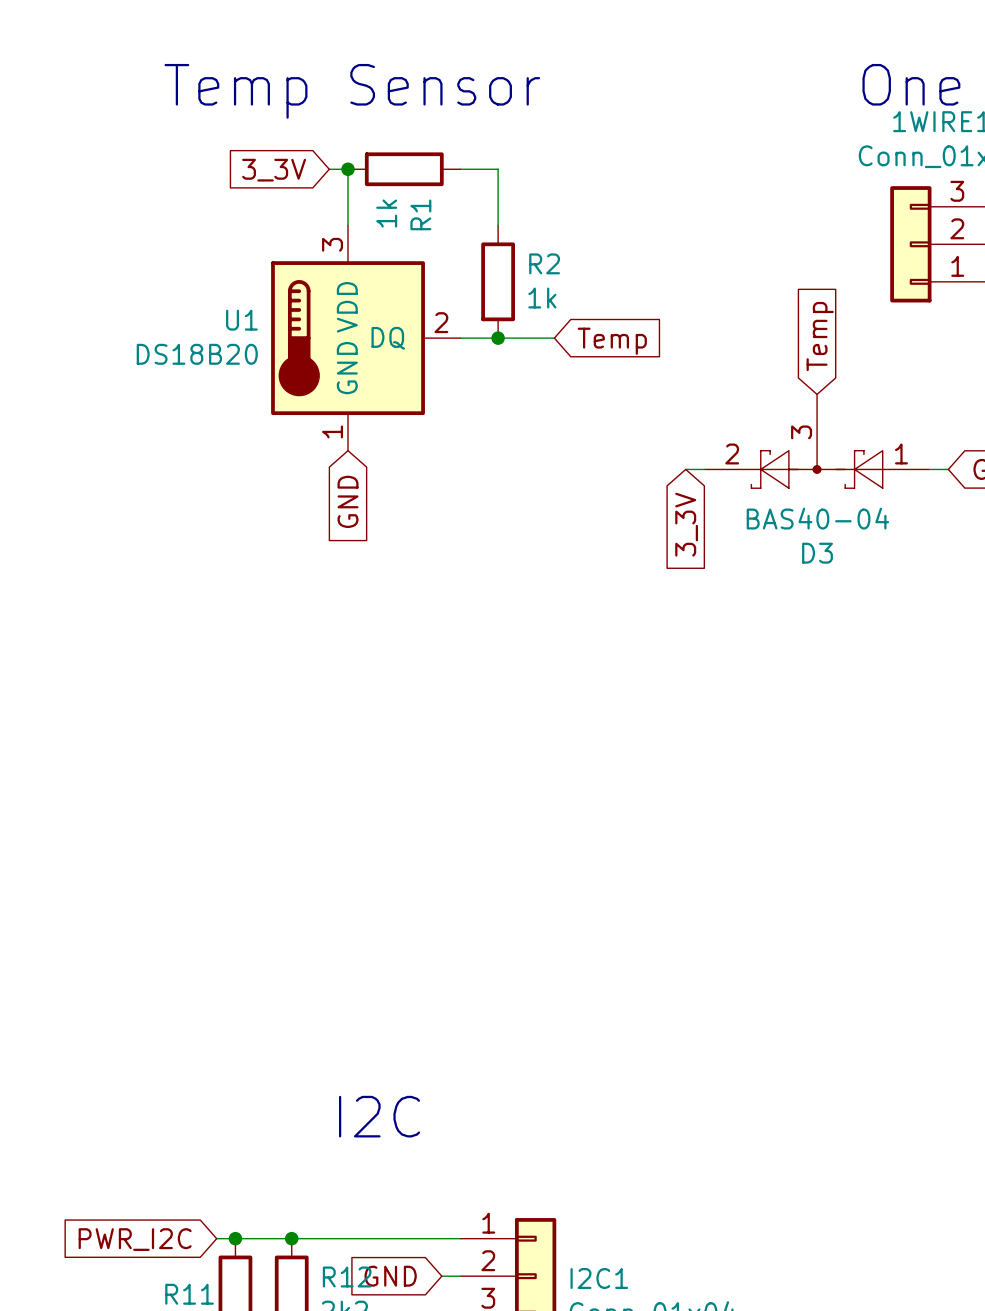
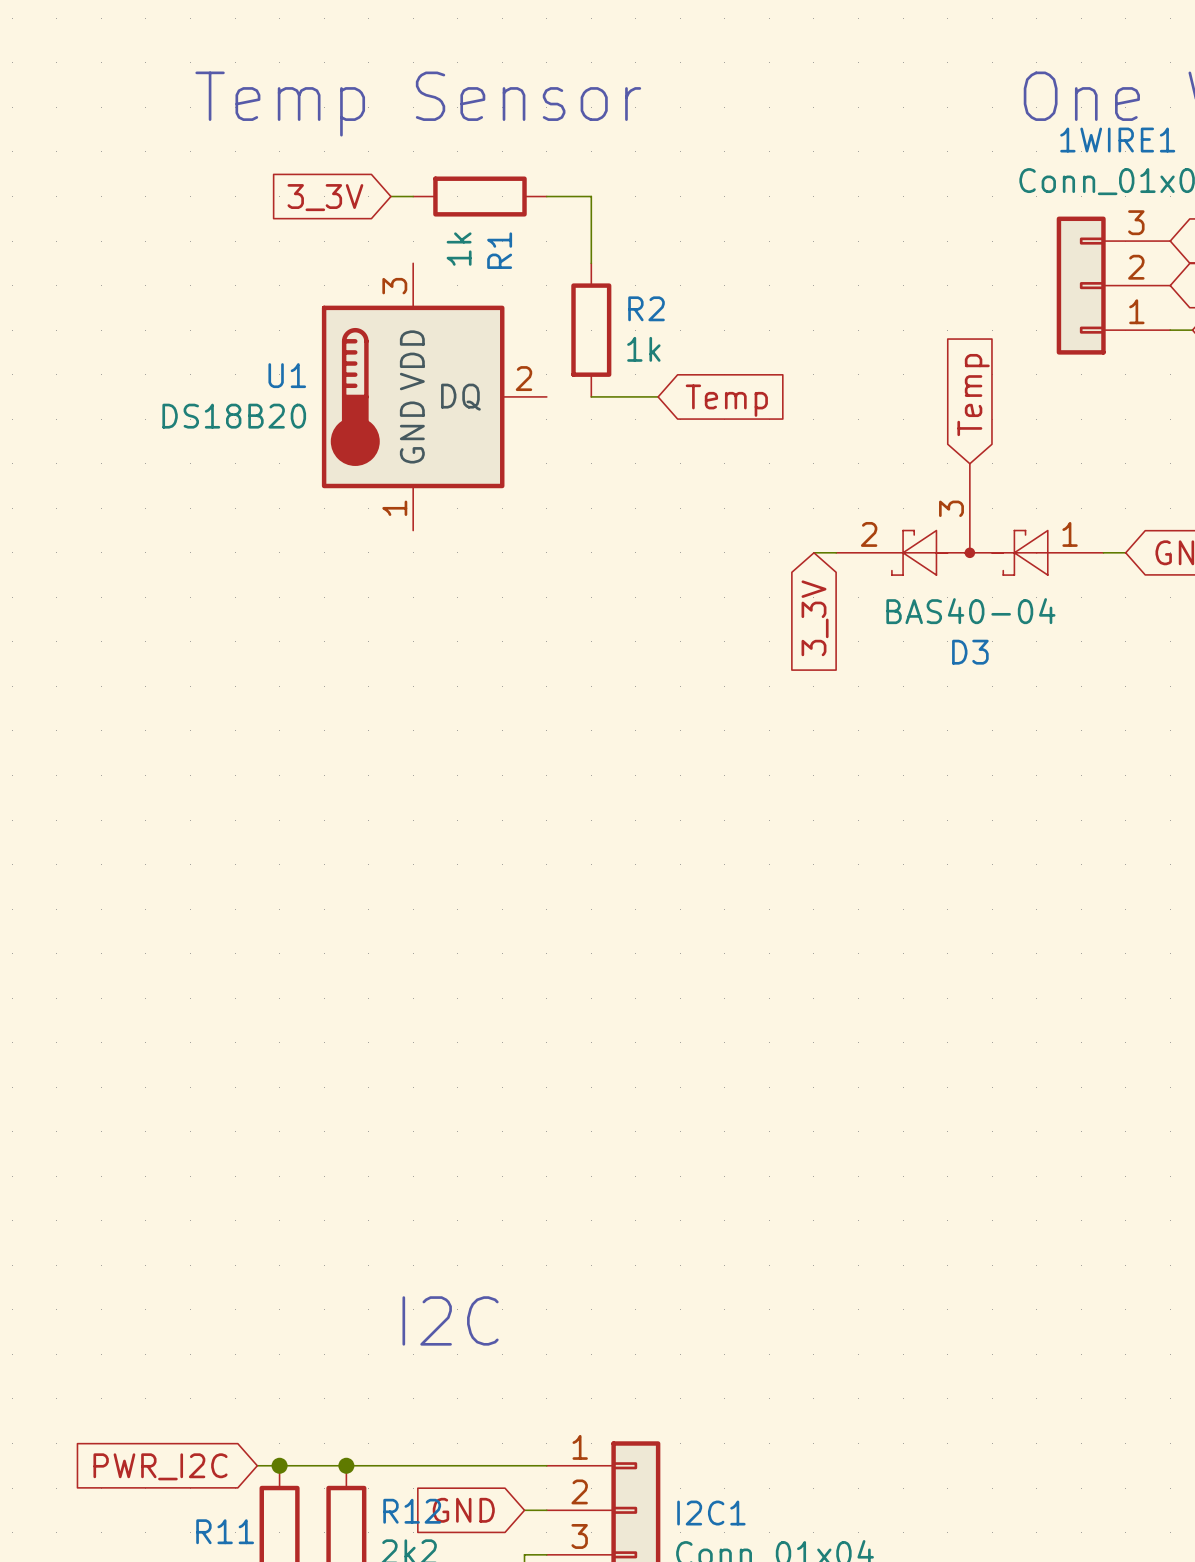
wire: (348, 169) (348, 225) -> none
junction: (348, 169) -> none
wire: (460, 338) (498, 338) -> none
junction: (498, 338) -> none
global label: GND (348, 501) -> none

